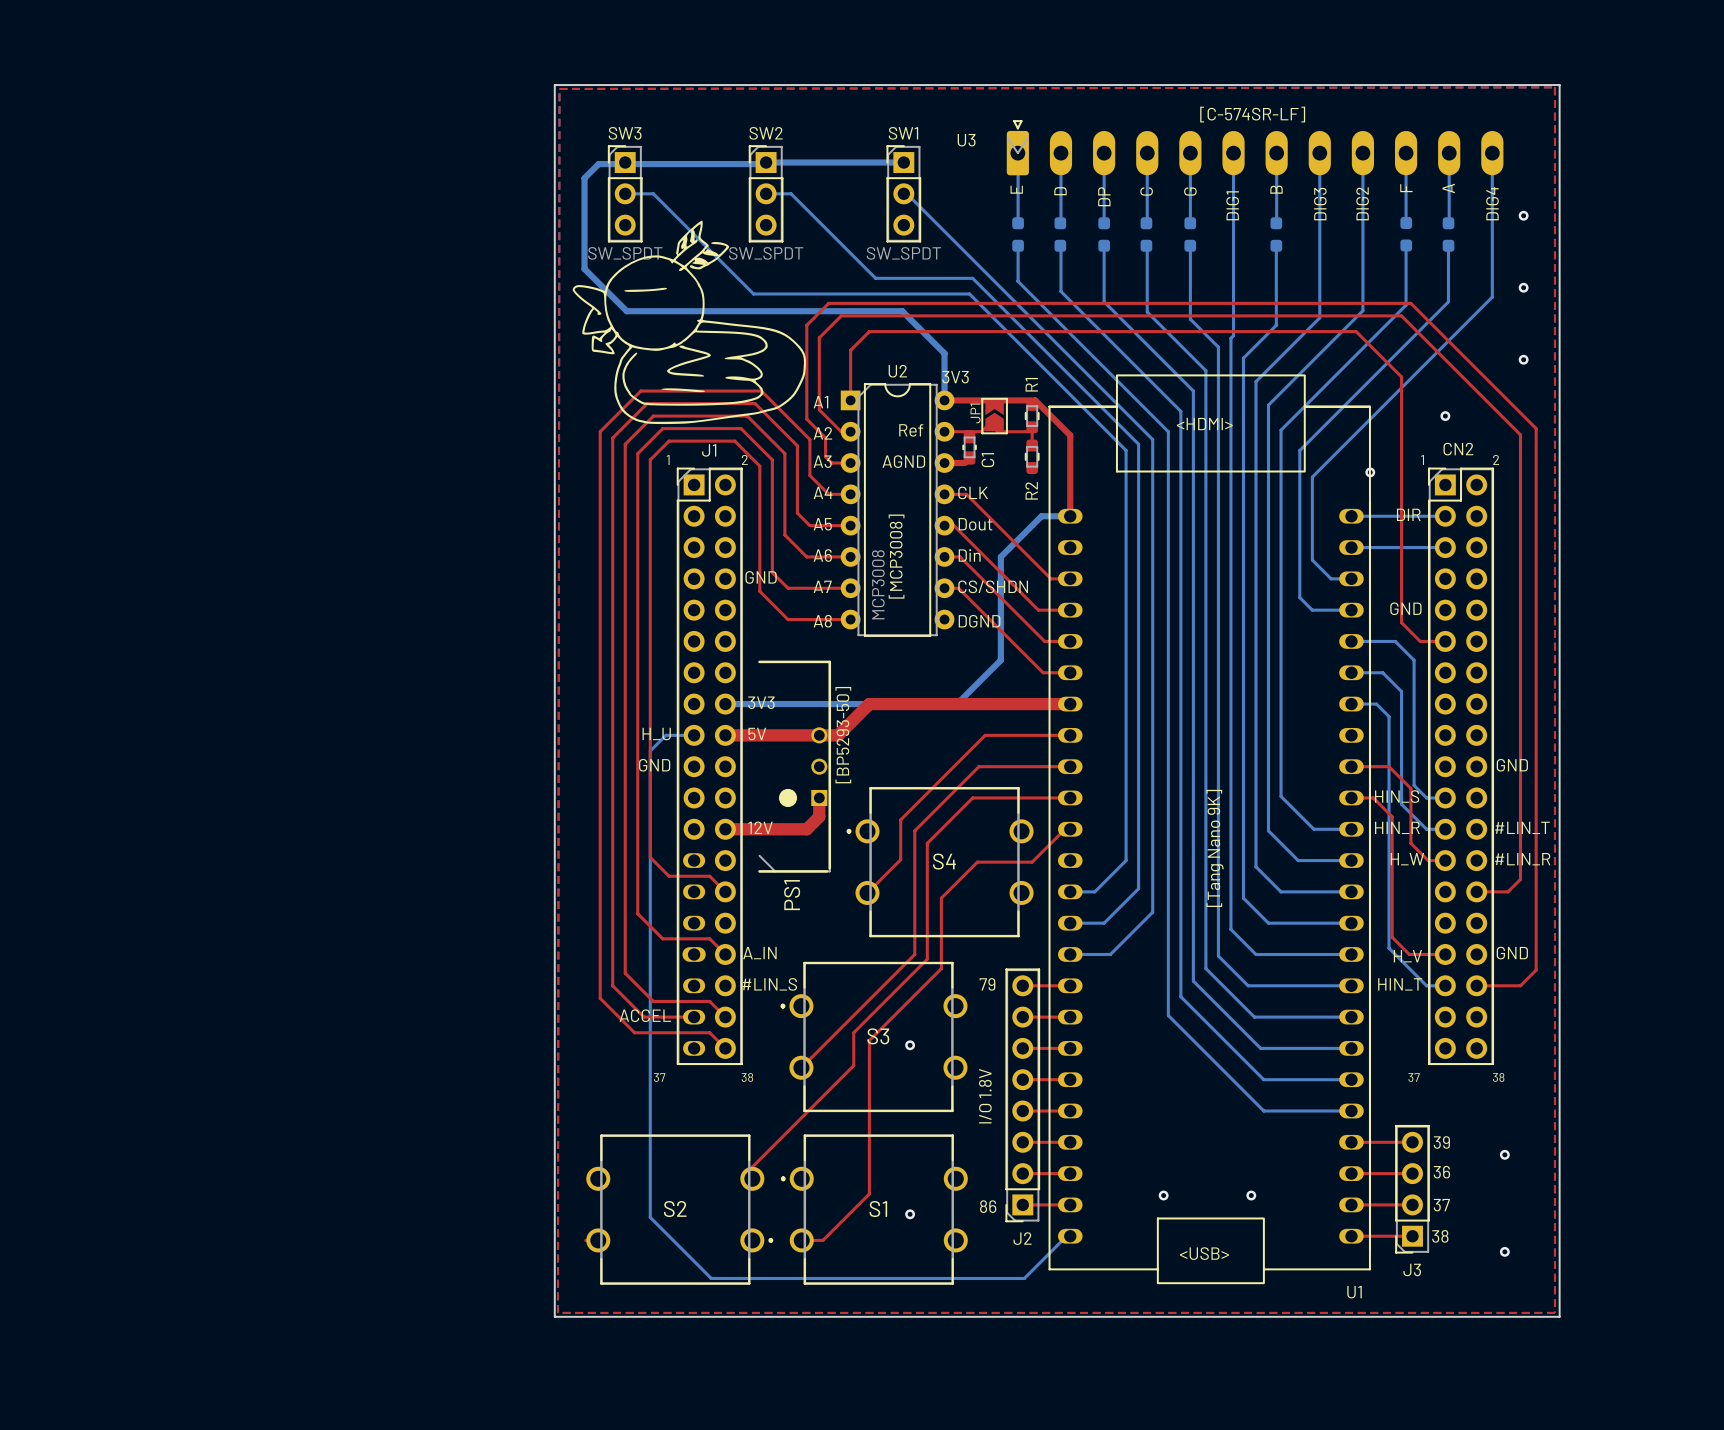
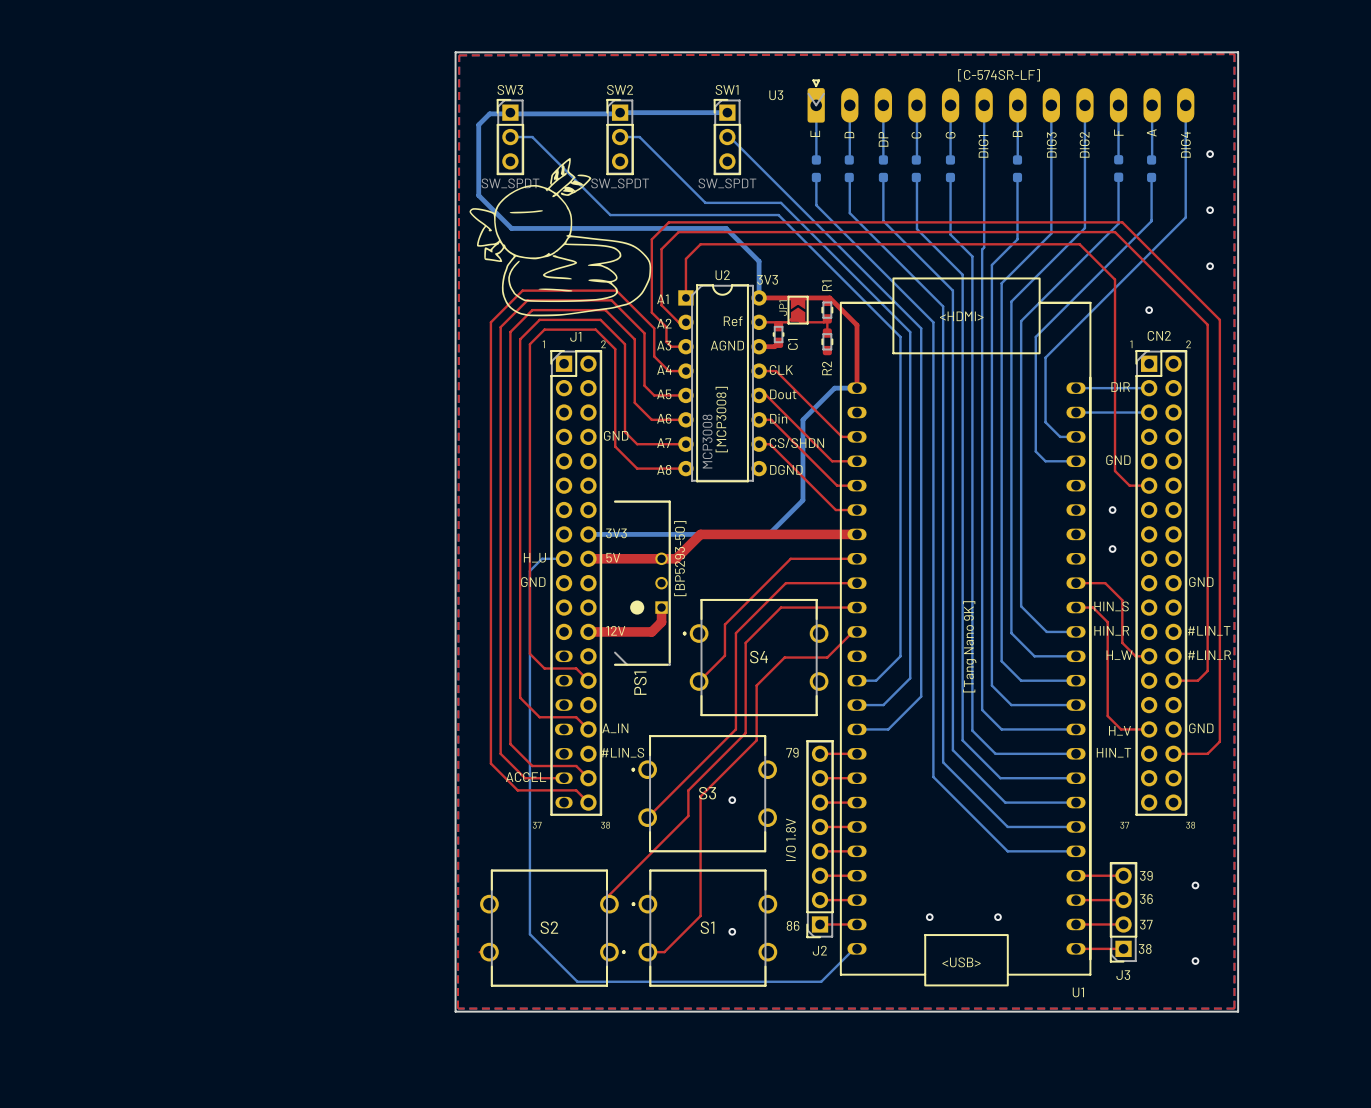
via: (1370, 472) -> none
bottom track: (1351, 641) (1395, 641) (1414, 660) (1414, 785) (1426, 797) (1445, 797) -> none
bottom track: (1351, 672) (1382, 672) (1401, 691) (1401, 804) (1426, 829) (1445, 829) -> none
via: none -> (1112, 510)
bottom track: (1351, 704) (1376, 704) (1389, 716) (1389, 948) (1426, 985) (1445, 985) -> none
via: none -> (1112, 549)

